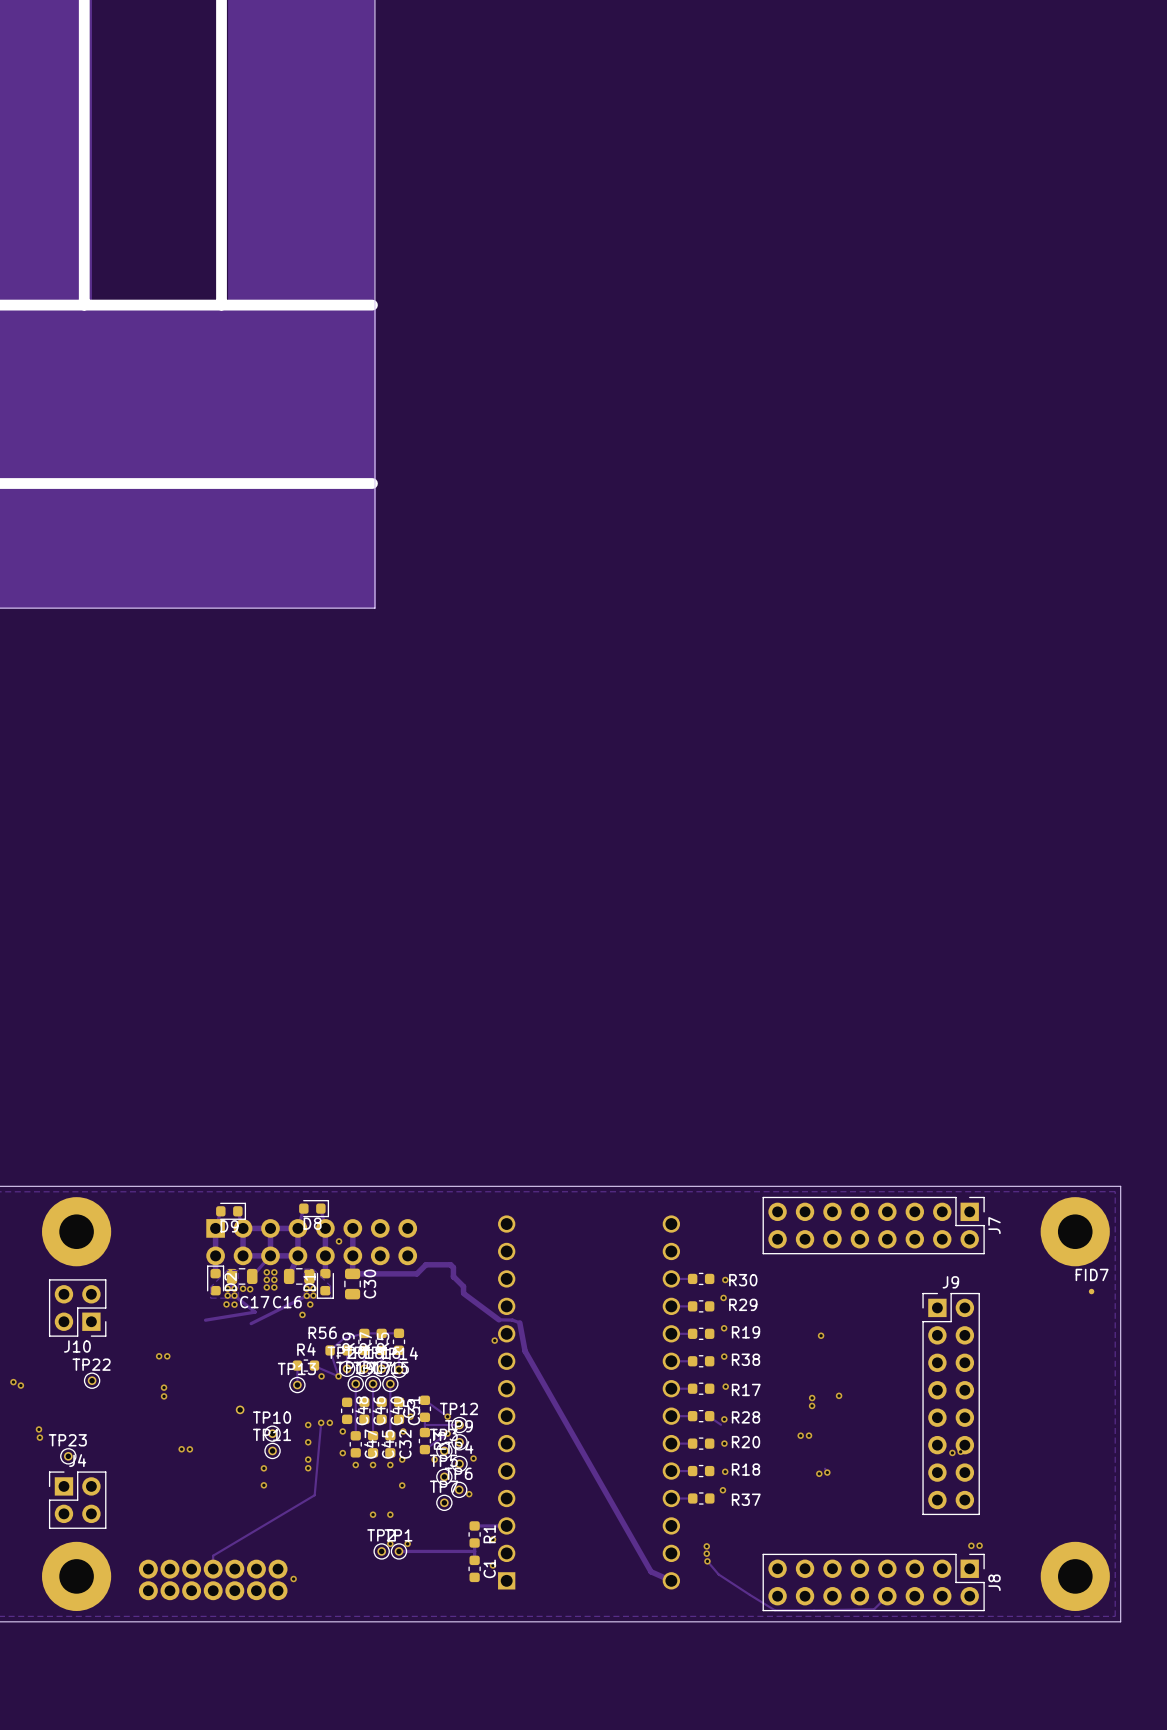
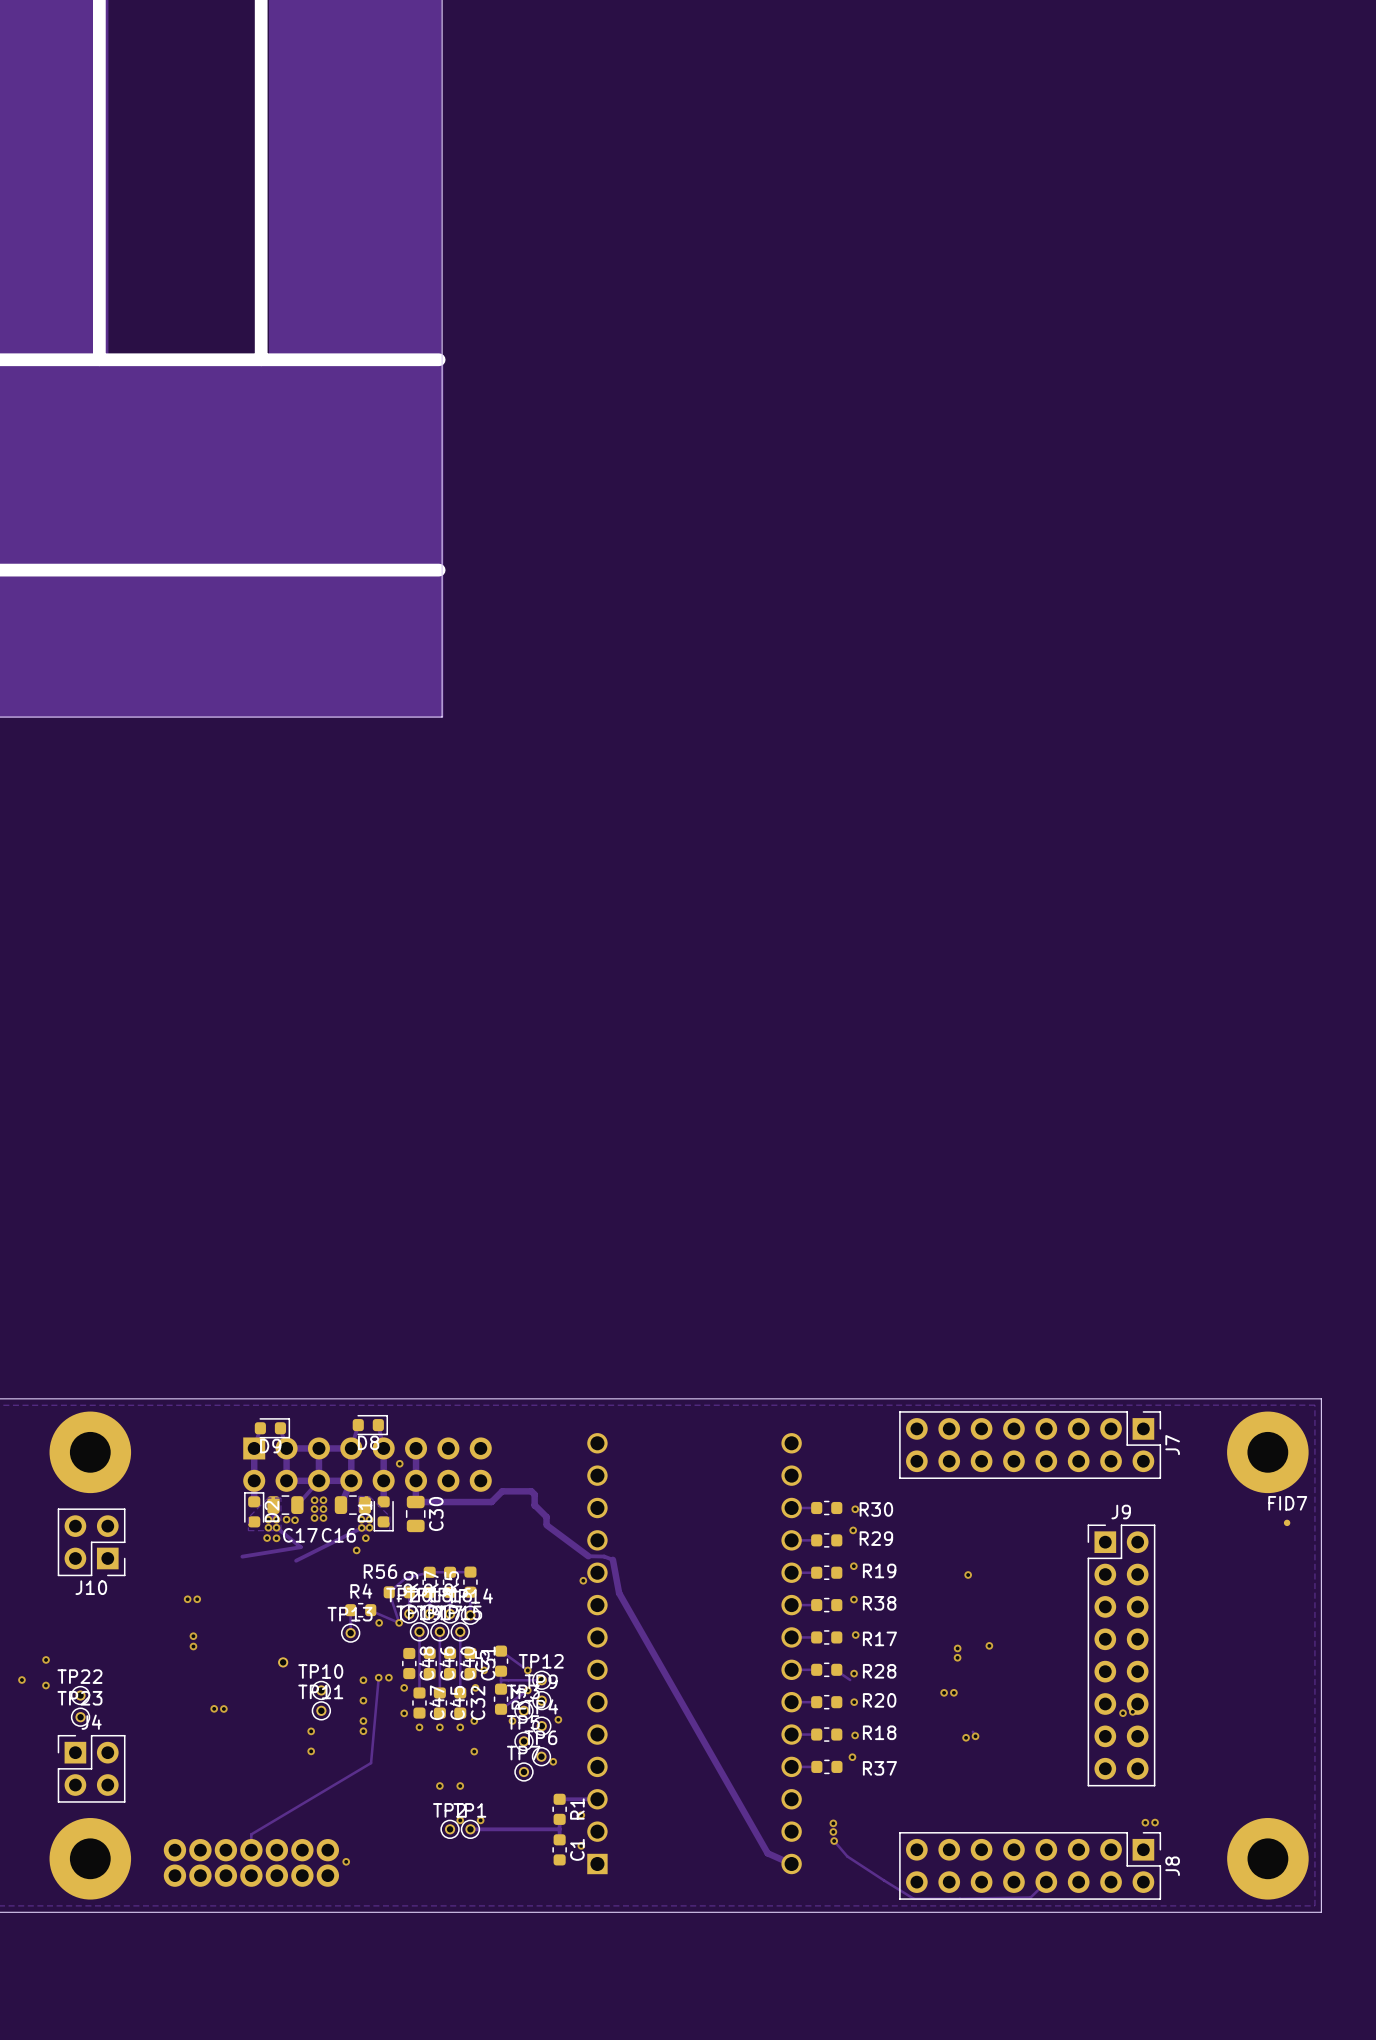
TP22 position: (92, 1380) -> (80, 1695)
via: (13, 1382) -> none
via: (20, 1385) -> none
via: none -> (46, 1659)
via: none -> (21, 1680)
via: (39, 1437) -> none

